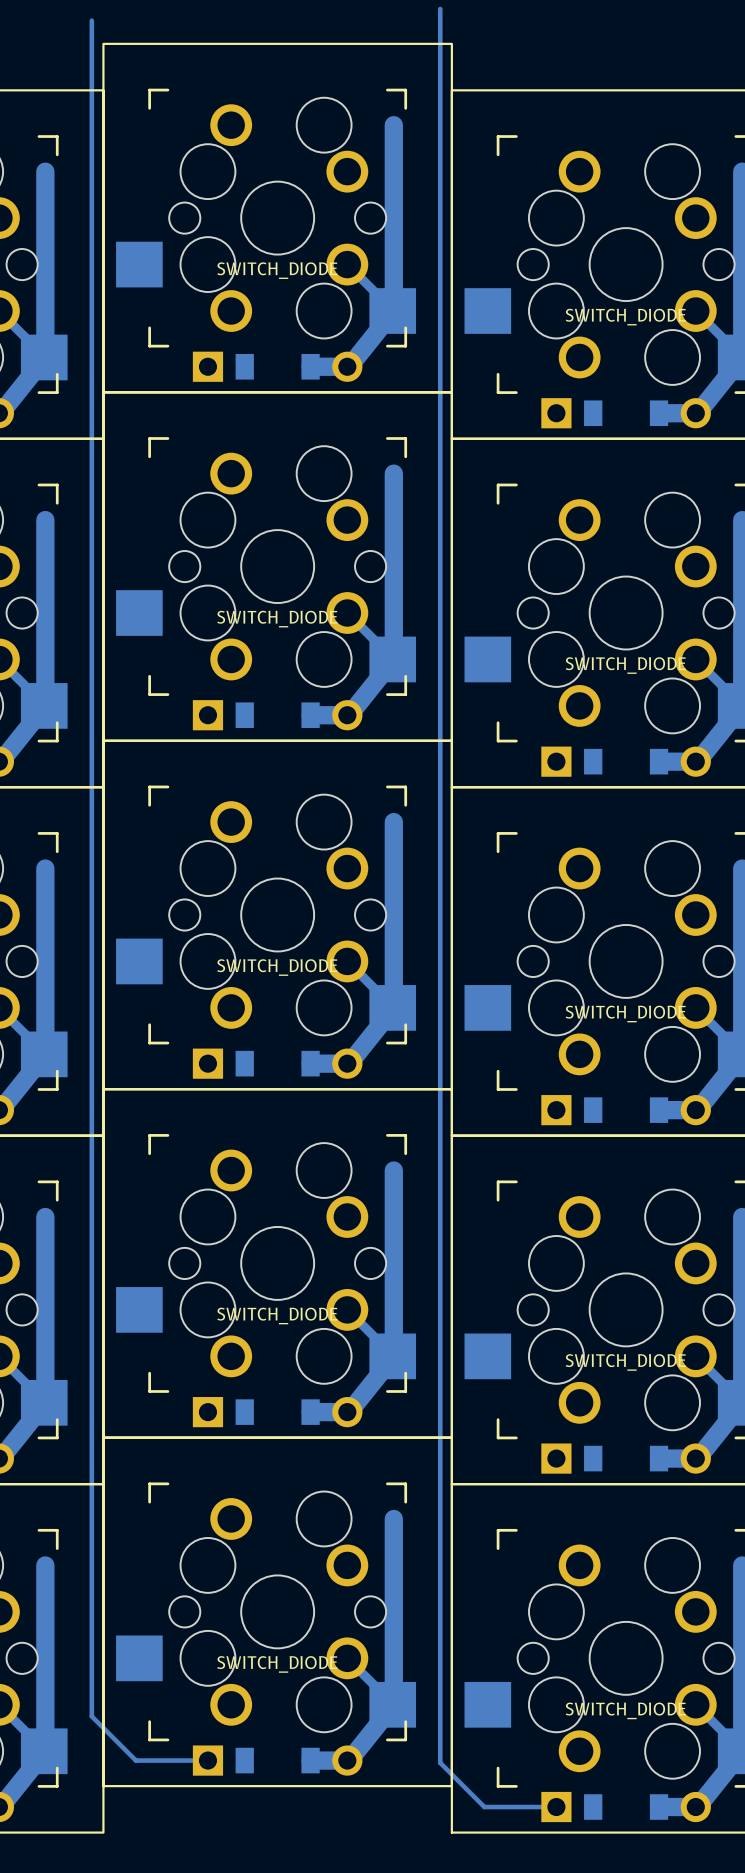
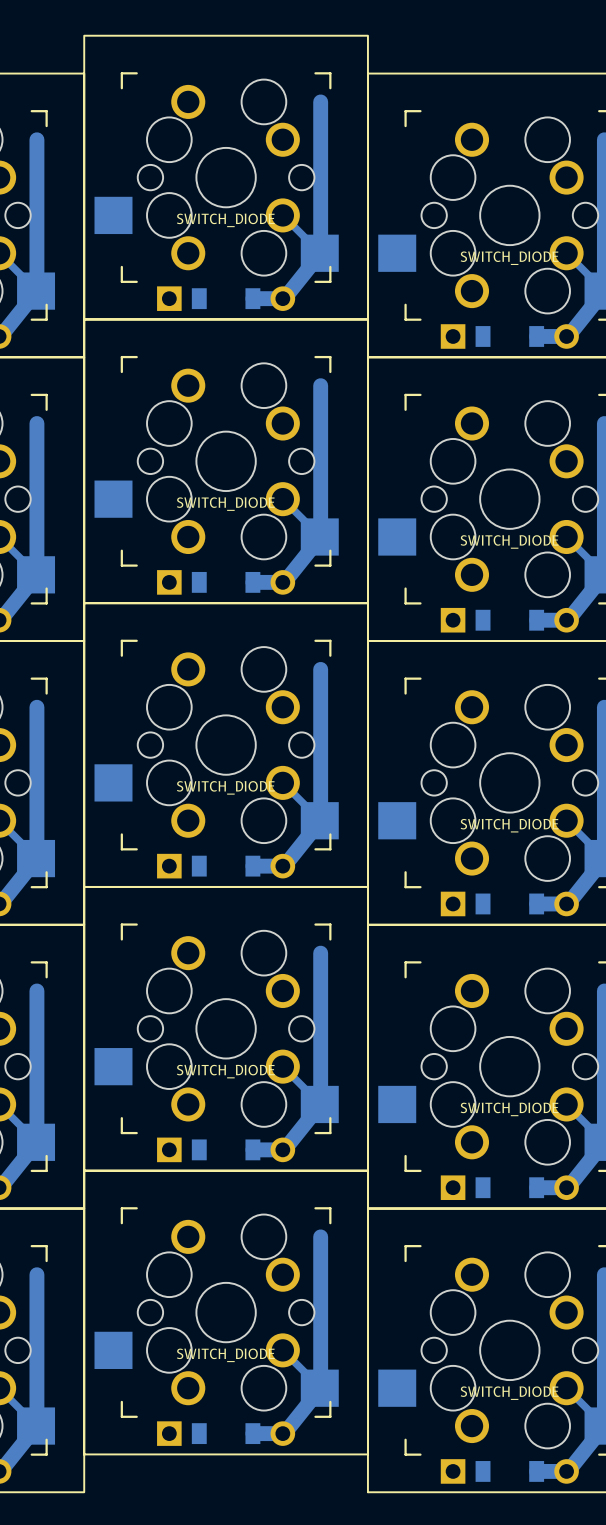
track: (440, 9) (440, 1762) (484, 1807) (556, 1807) -> none
track: (91, 20) (91, 1716) (135, 1760) (207, 1760) -> none

